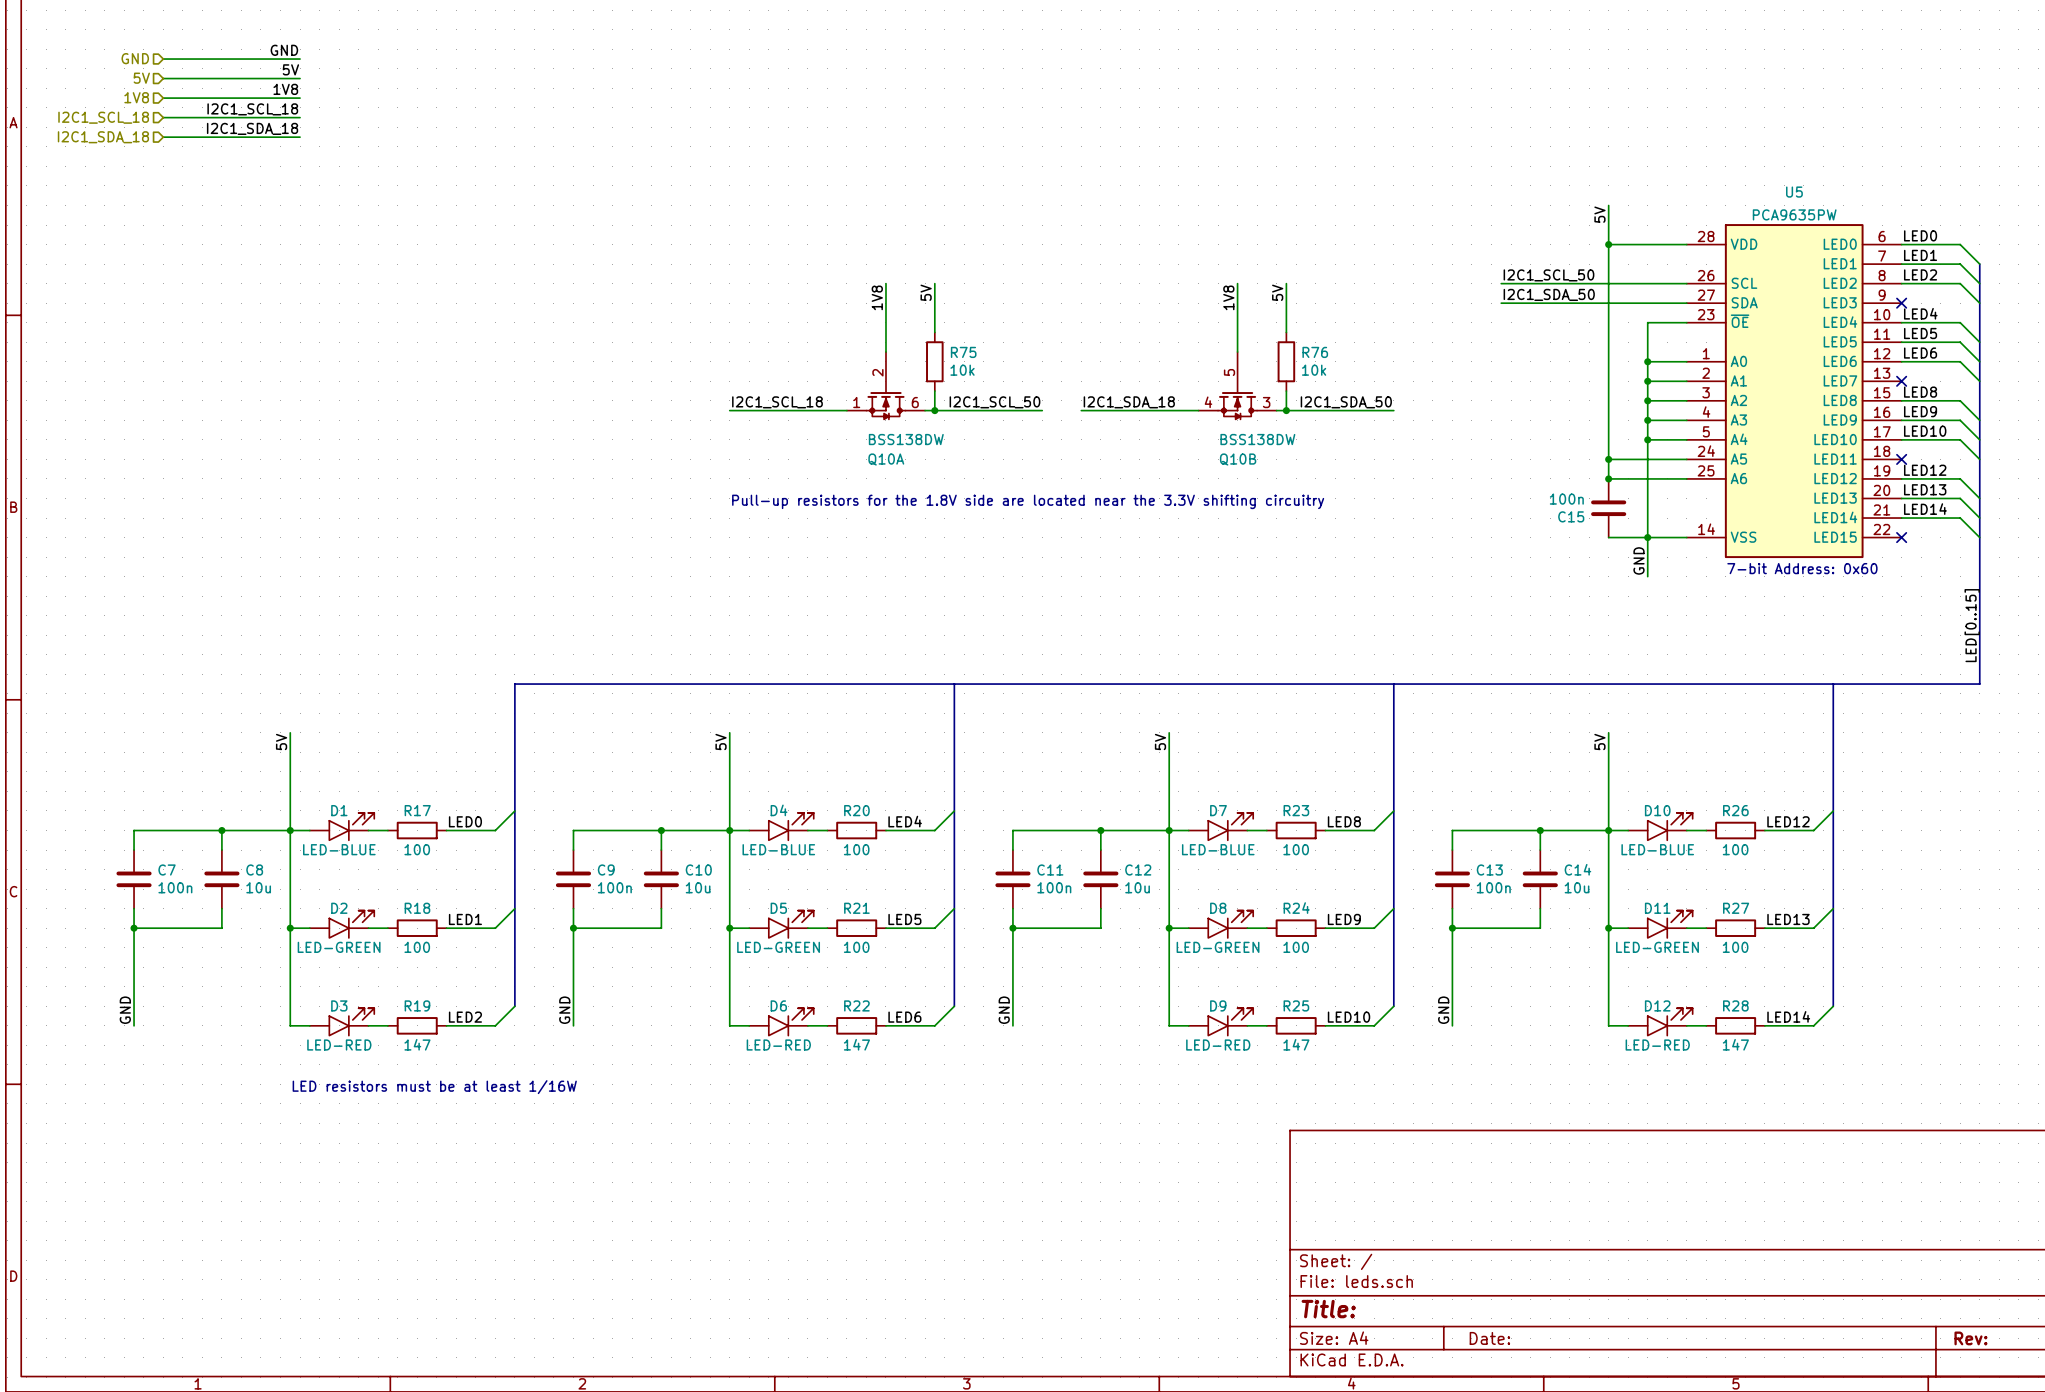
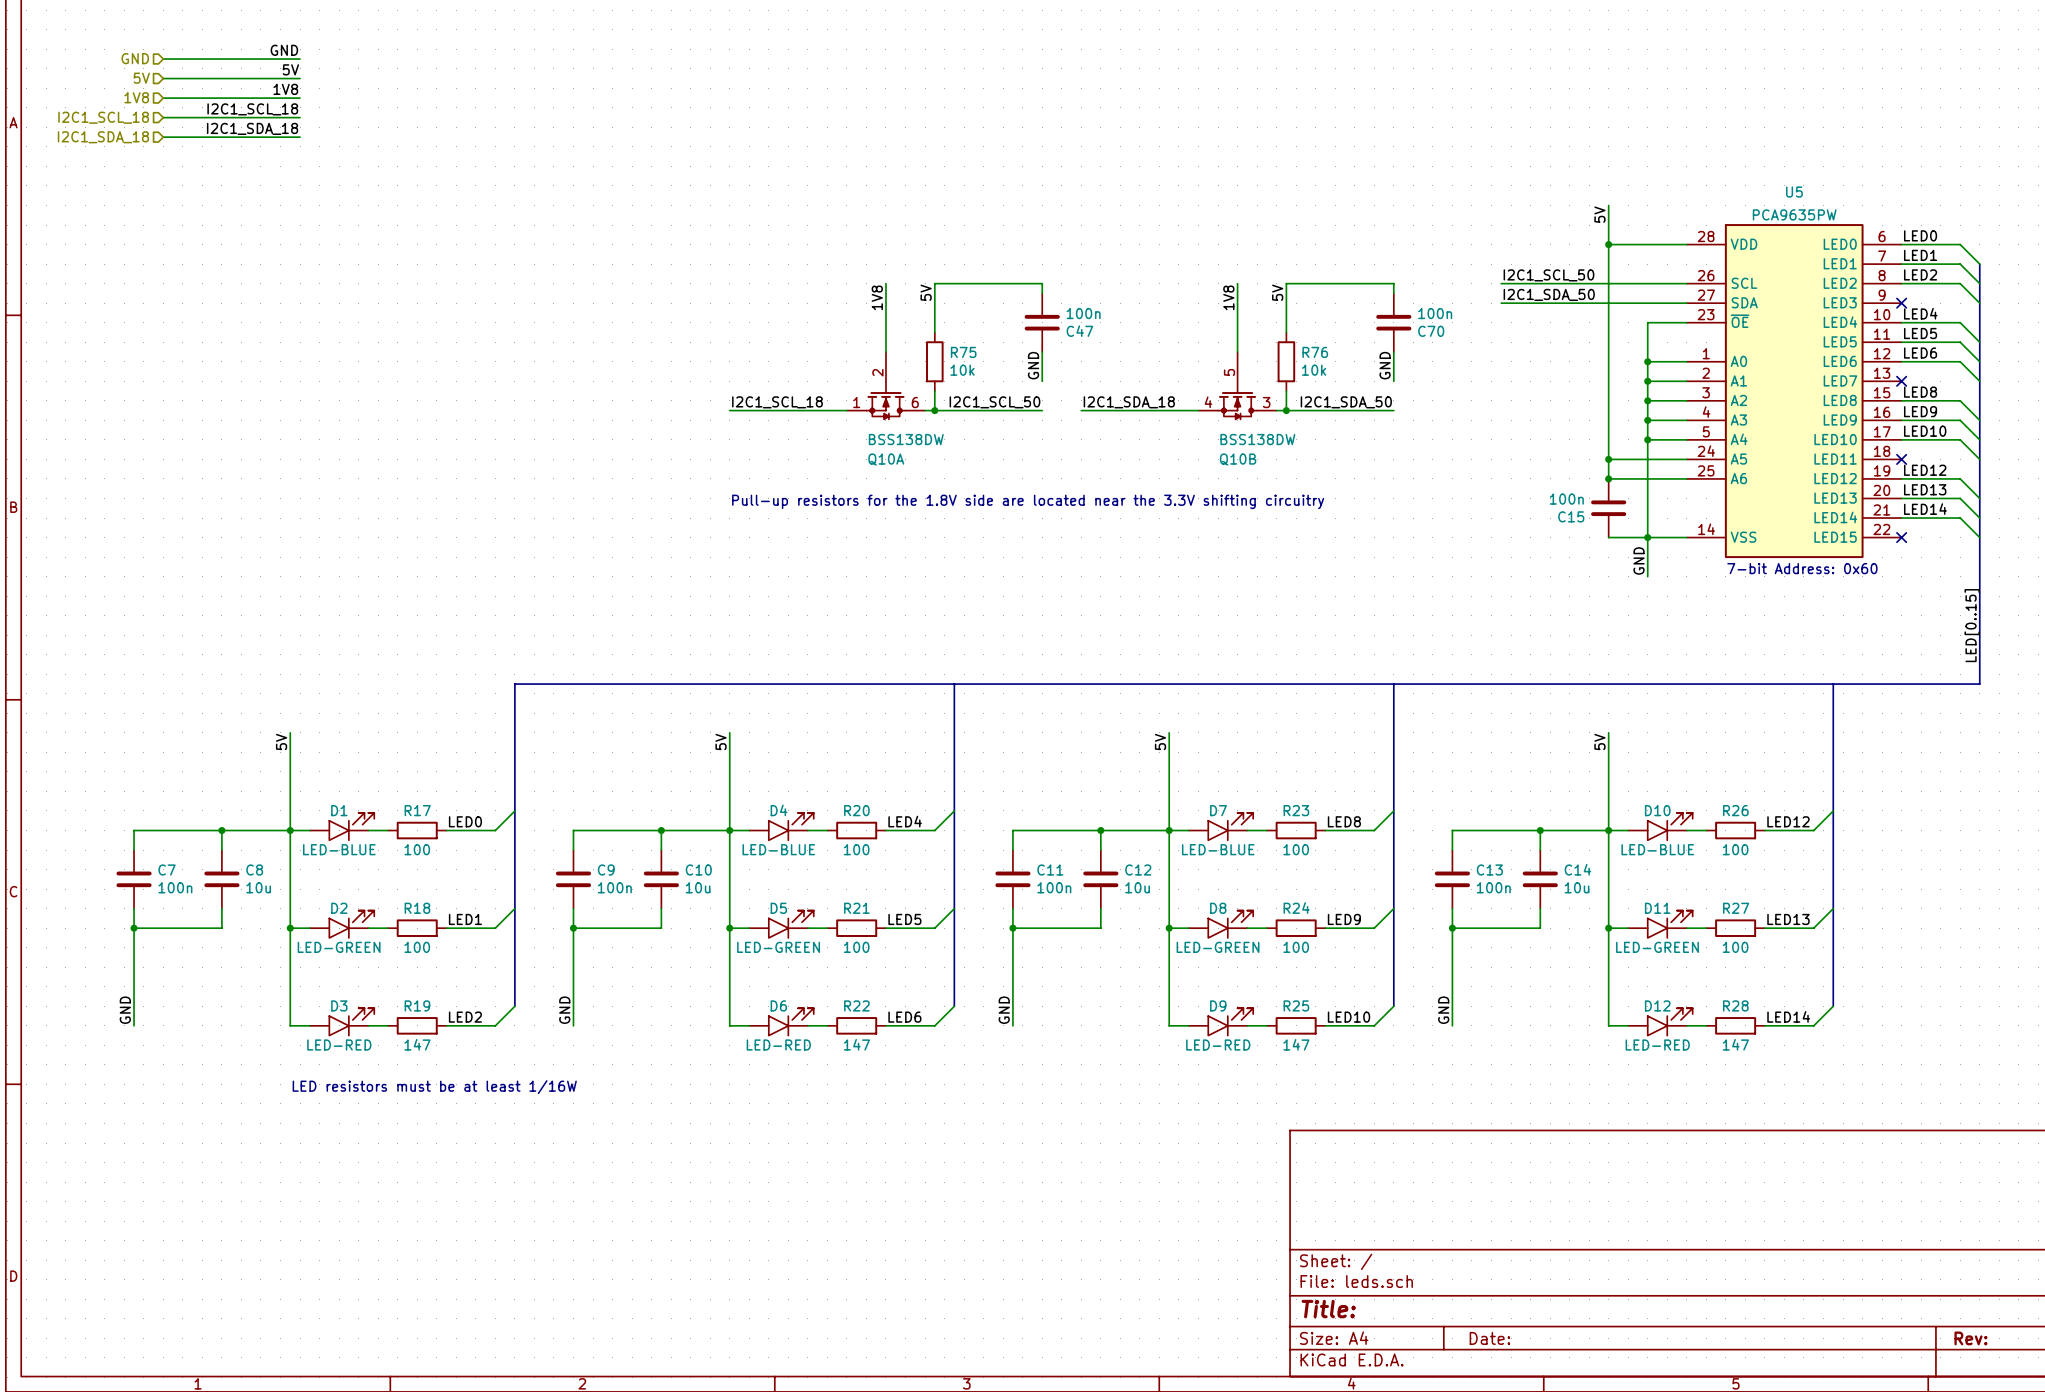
wire: none -> (934, 283) (1042, 283) (1042, 293)
wire: none -> (1286, 283) (1393, 283) (1393, 293)
C47: none -> 100n (1042, 322)
C70: none -> 100n (1393, 322)
wire: none -> (1042, 352) (1042, 381)
wire: none -> (1393, 352) (1393, 381)
label: none -> GND (1033, 365)
label: none -> GND (1385, 365)

